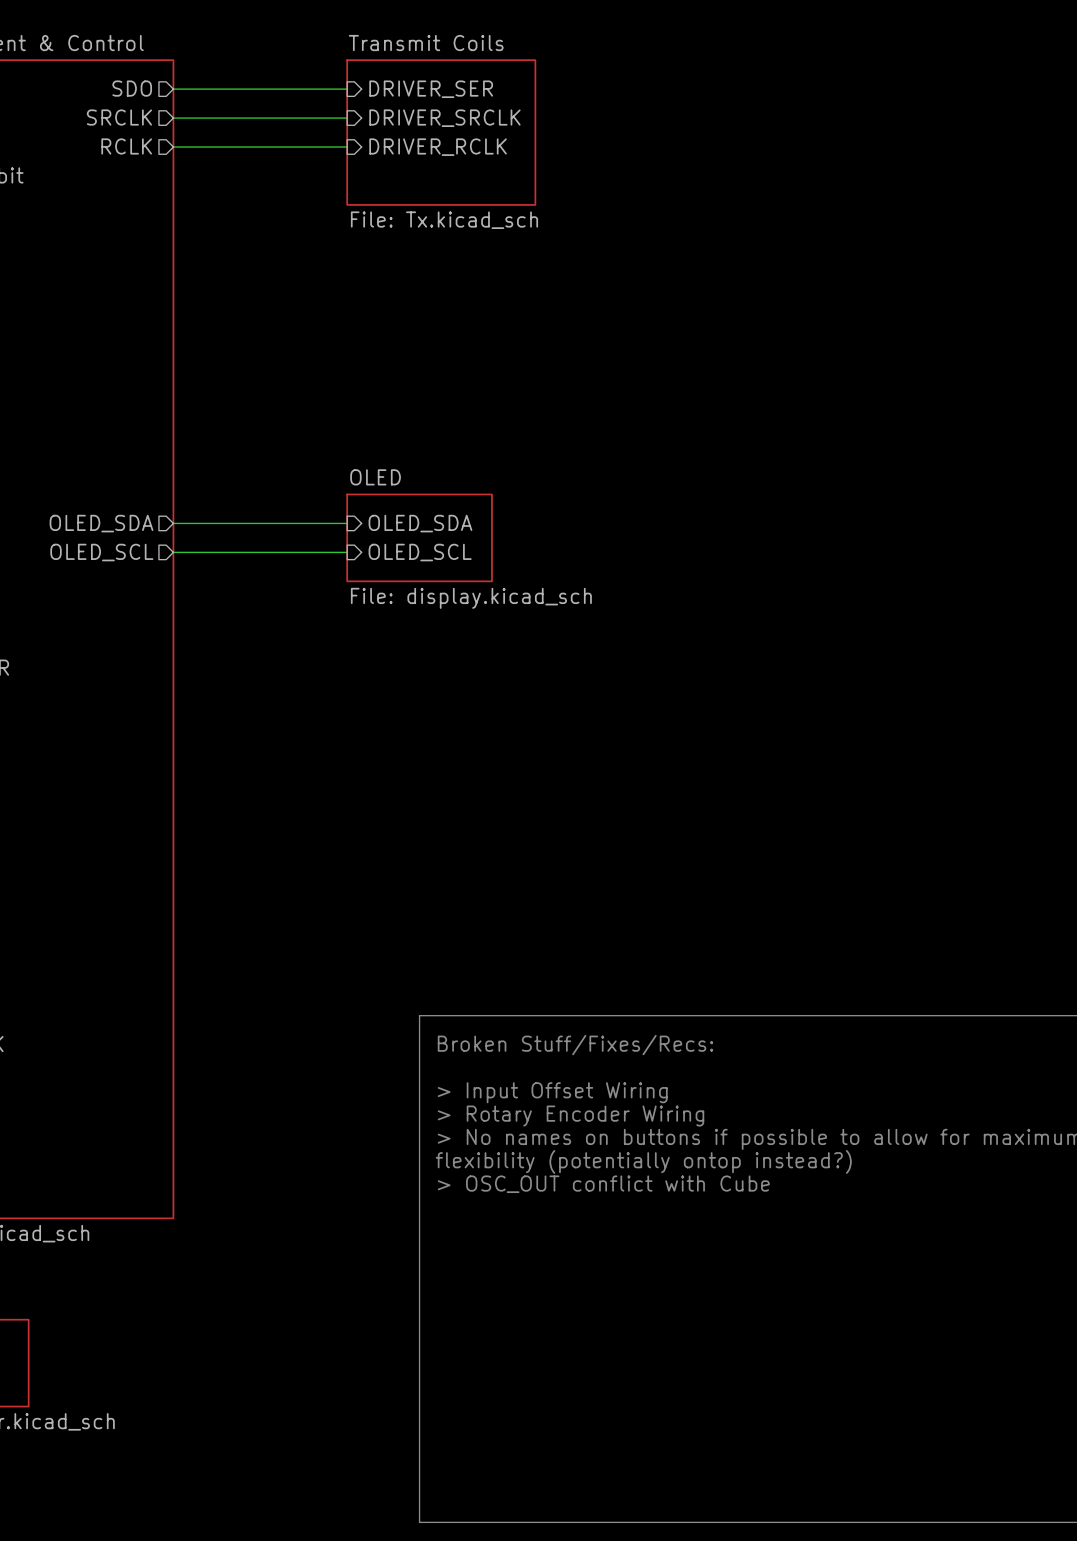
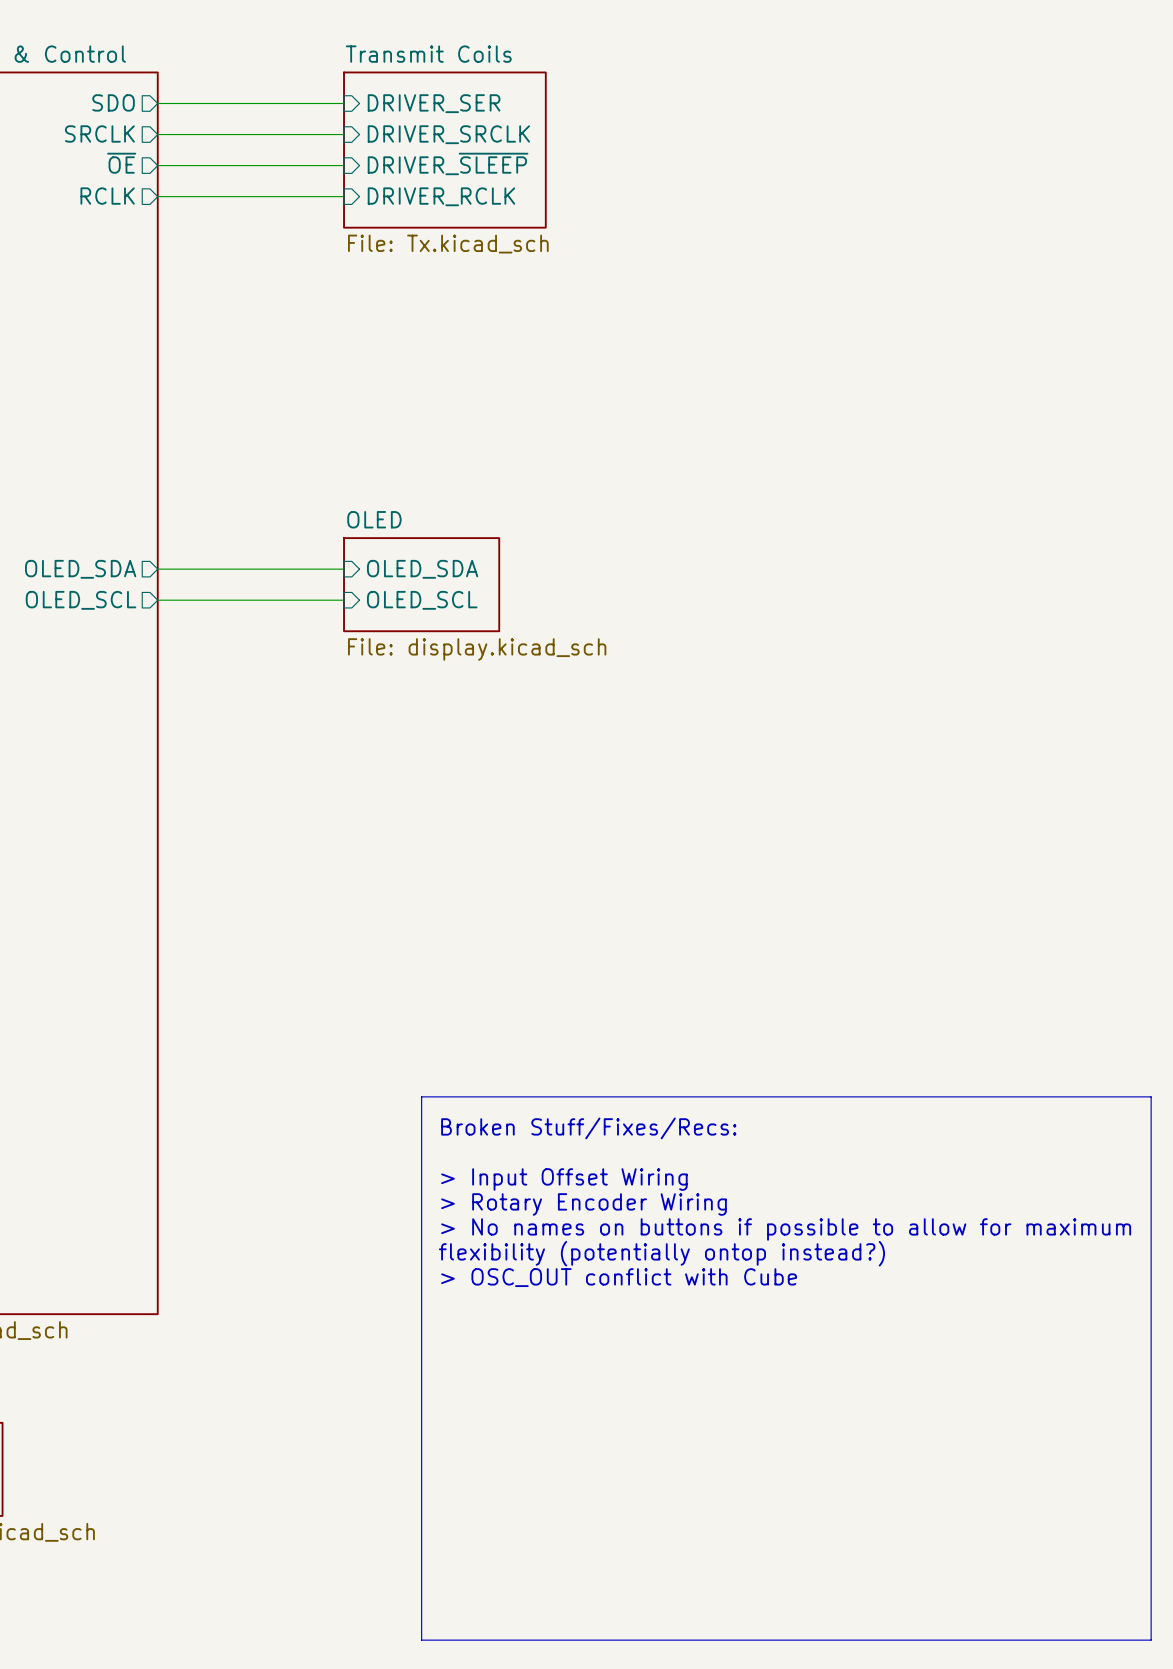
sheet pin: RCLK (126, 146) -> ~{OE} (121, 163)
sheet pin: DRIVER_RCLK (438, 147) -> DRIVER_~{SLEEP} (448, 163)
sheet pin: none -> RCLK (107, 196)
wire: none -> (157, 196) (344, 196)
sheet pin: none -> DRIVER_RCLK (441, 196)

